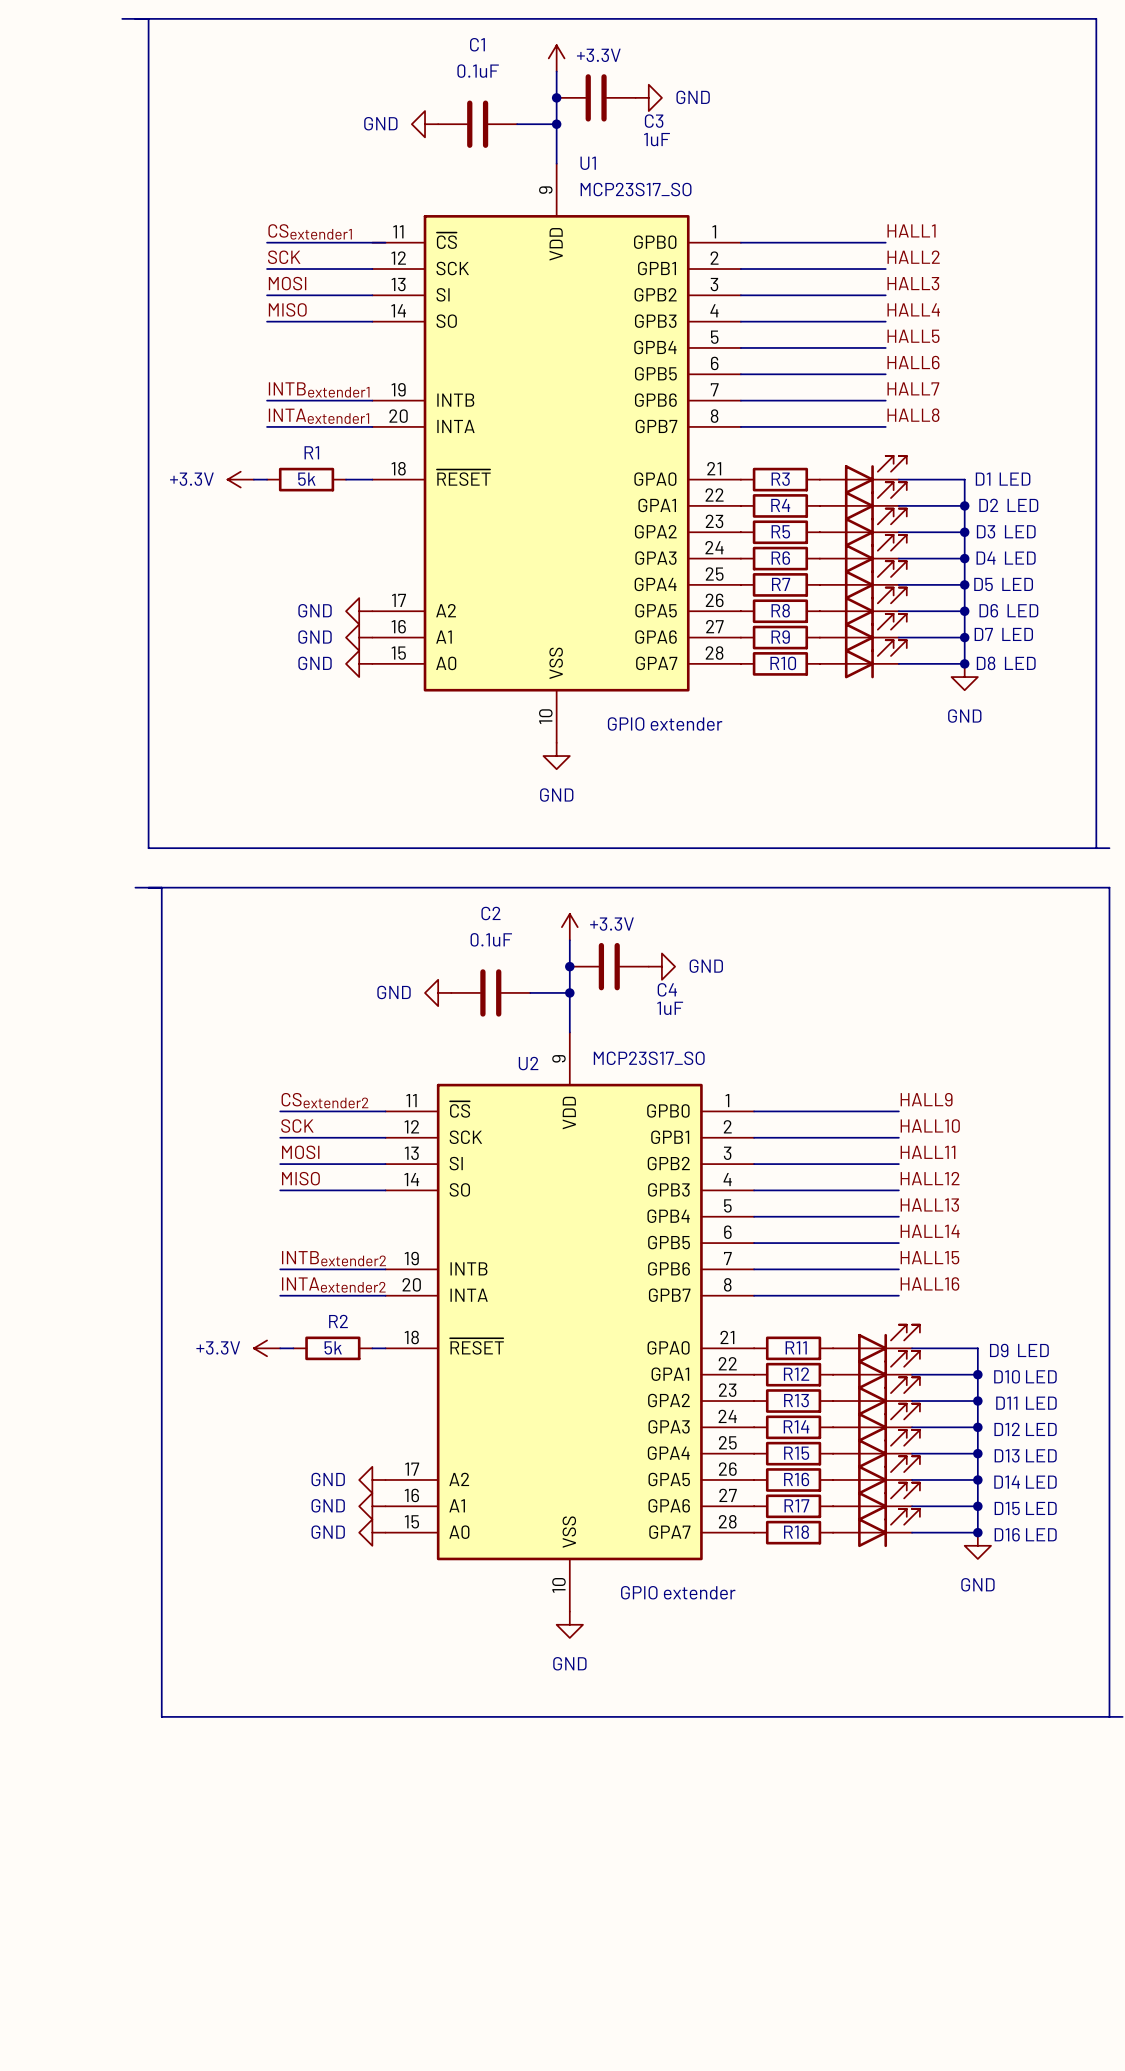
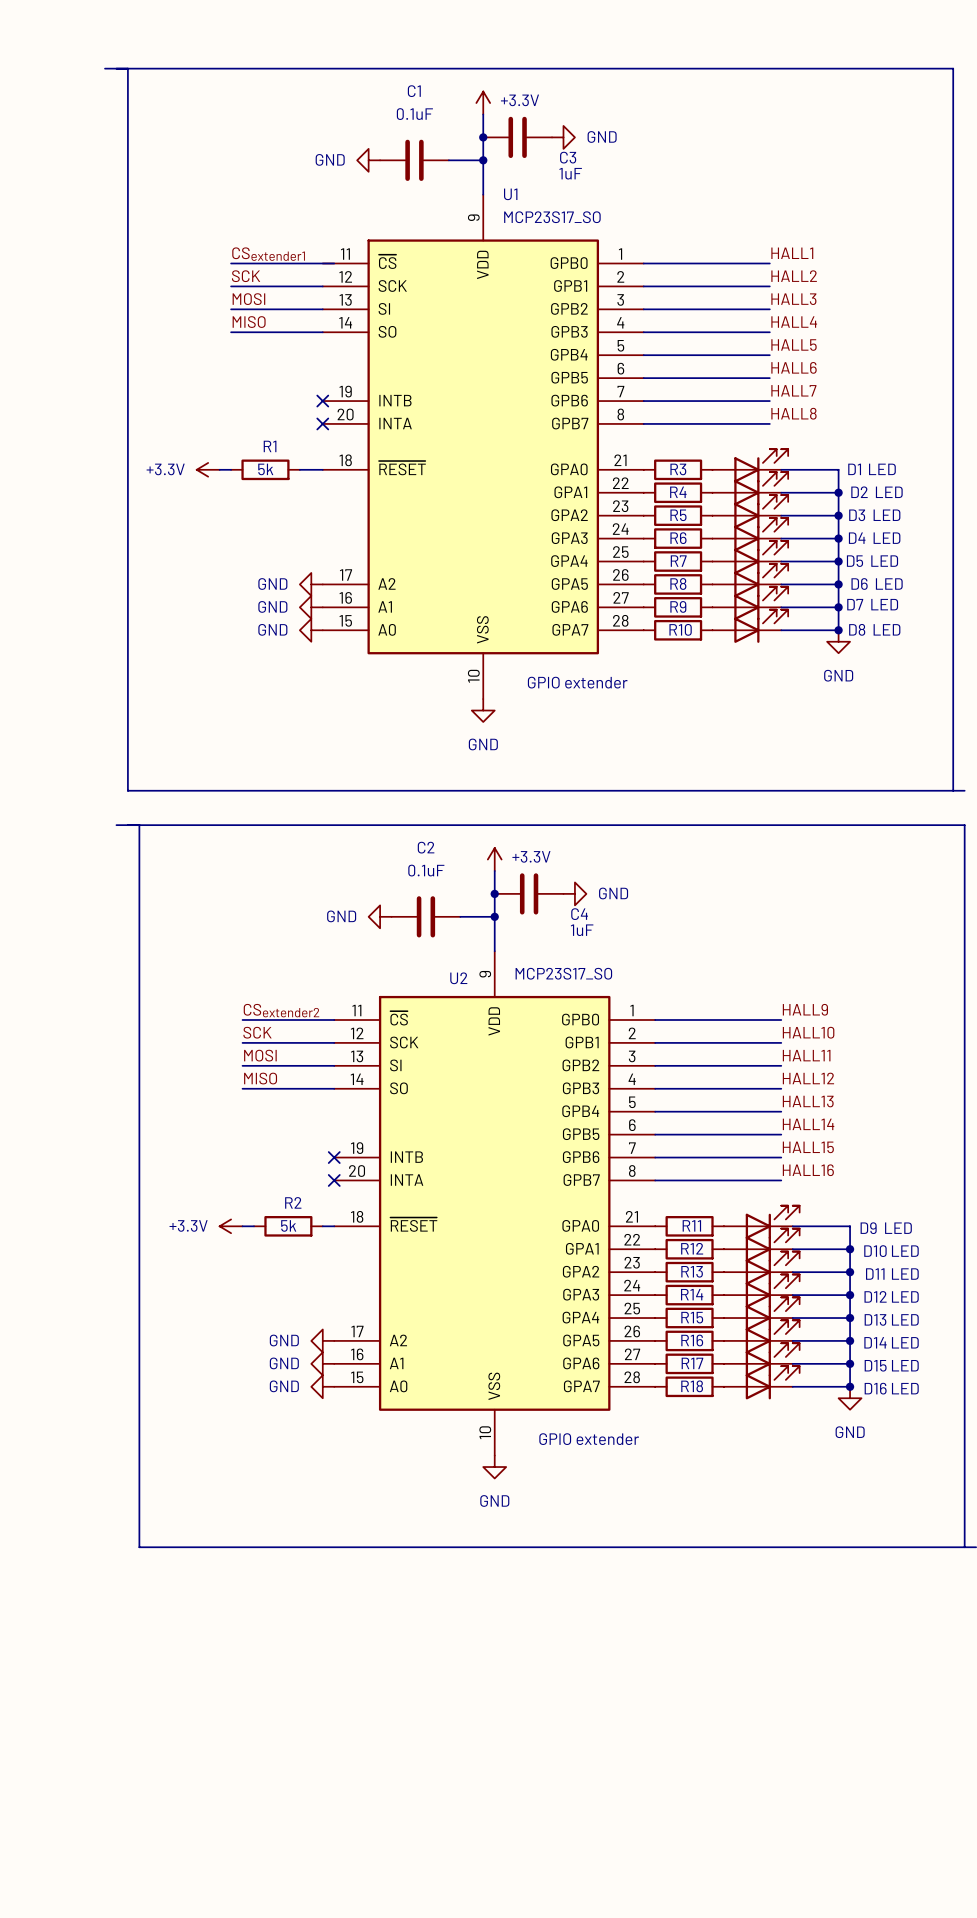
label: INTBextender1 (319, 389) -> none
wire: (267, 400) (372, 400) -> none
no-connect mark: none -> (322, 401)
label: INTAextender1 (318, 416) -> none
wire: (267, 426) (372, 426) -> none
no-connect mark: none -> (322, 423)
label: INTBextender2 (333, 1258) -> none
wire: (280, 1269) (385, 1269) -> none
no-connect mark: none -> (334, 1157)
label: INTAextender2 (333, 1285) -> none
wire: (280, 1295) (385, 1295) -> none
no-connect mark: none -> (334, 1180)

